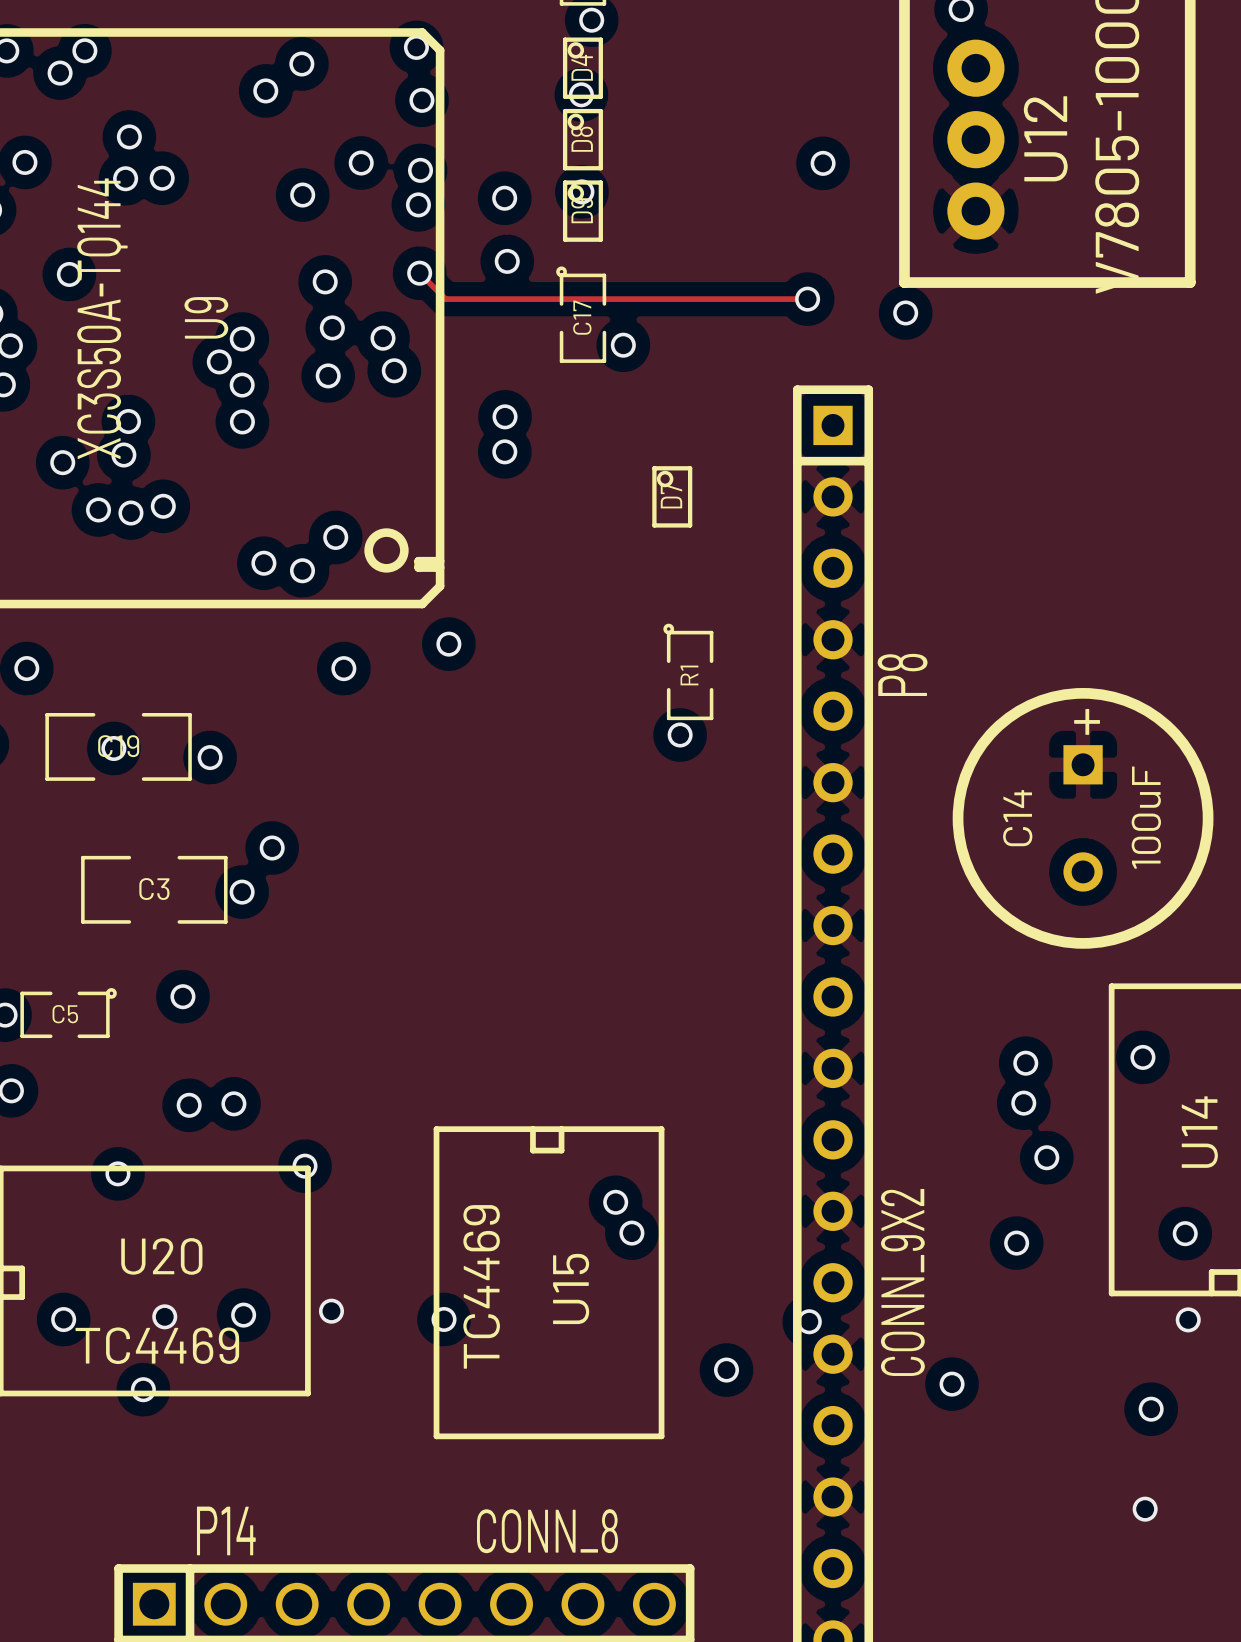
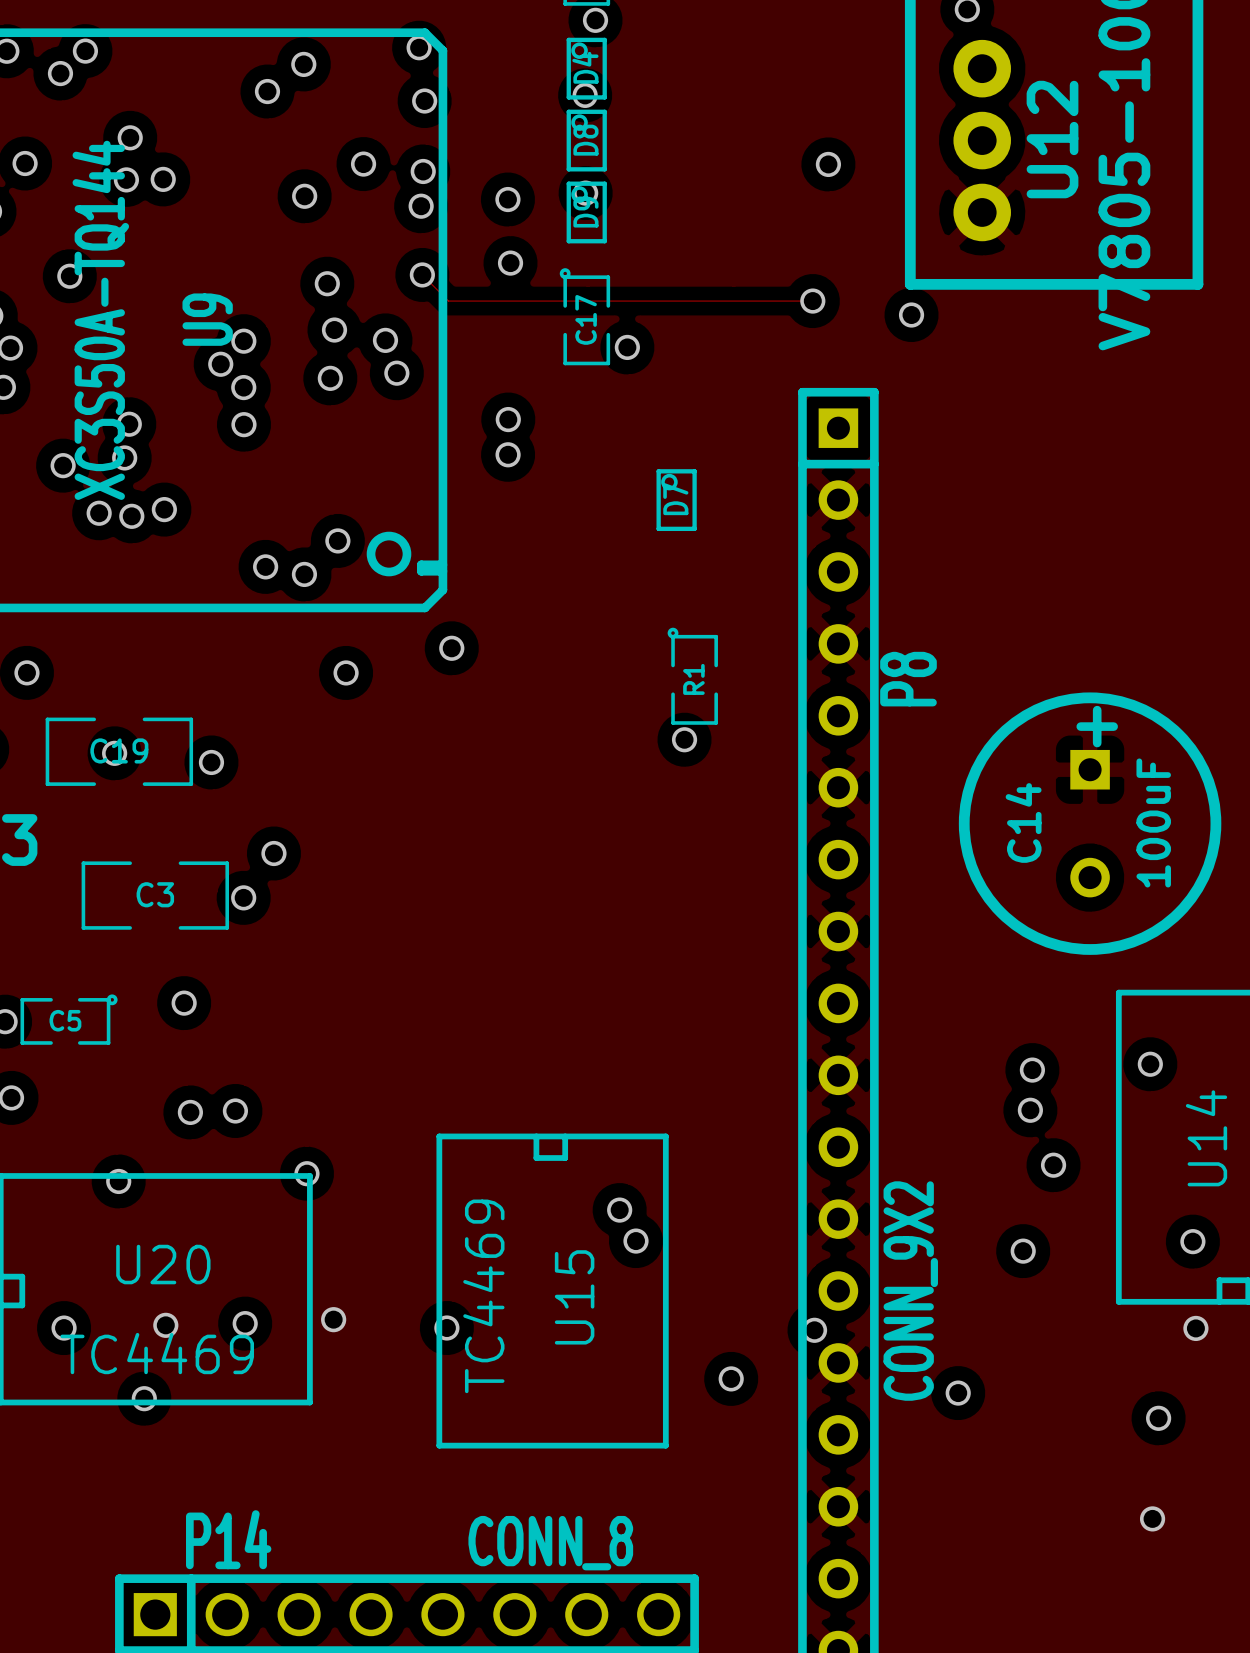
track width: thick (419, 273) (445, 299) (807, 299) -> thin (422, 274) (448, 301) (812, 301)

